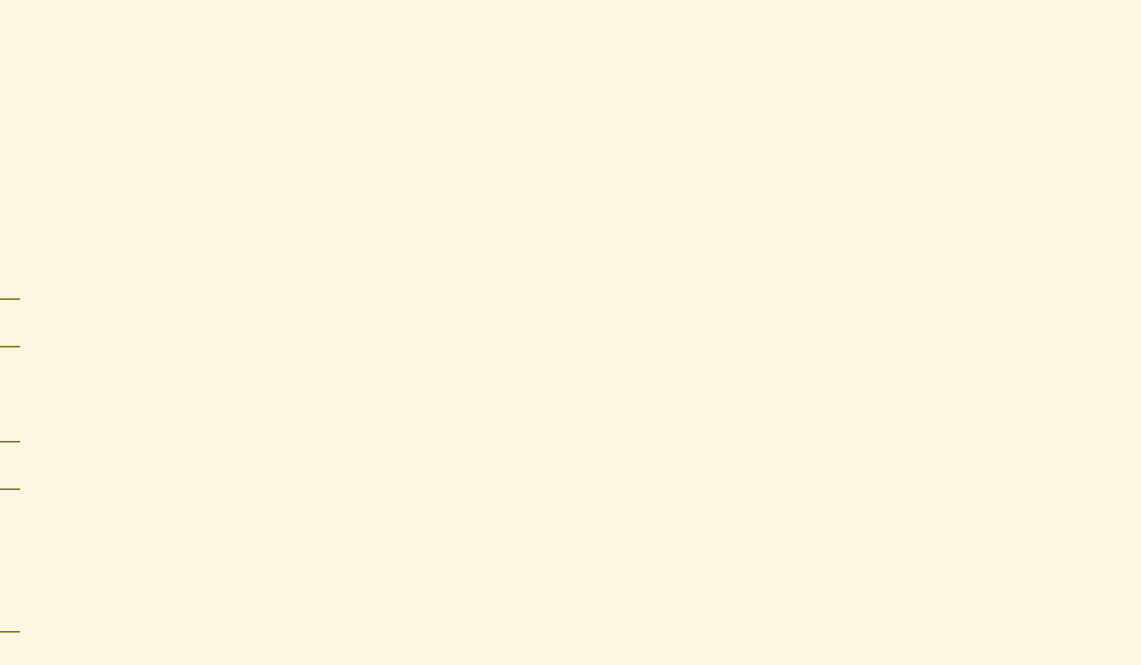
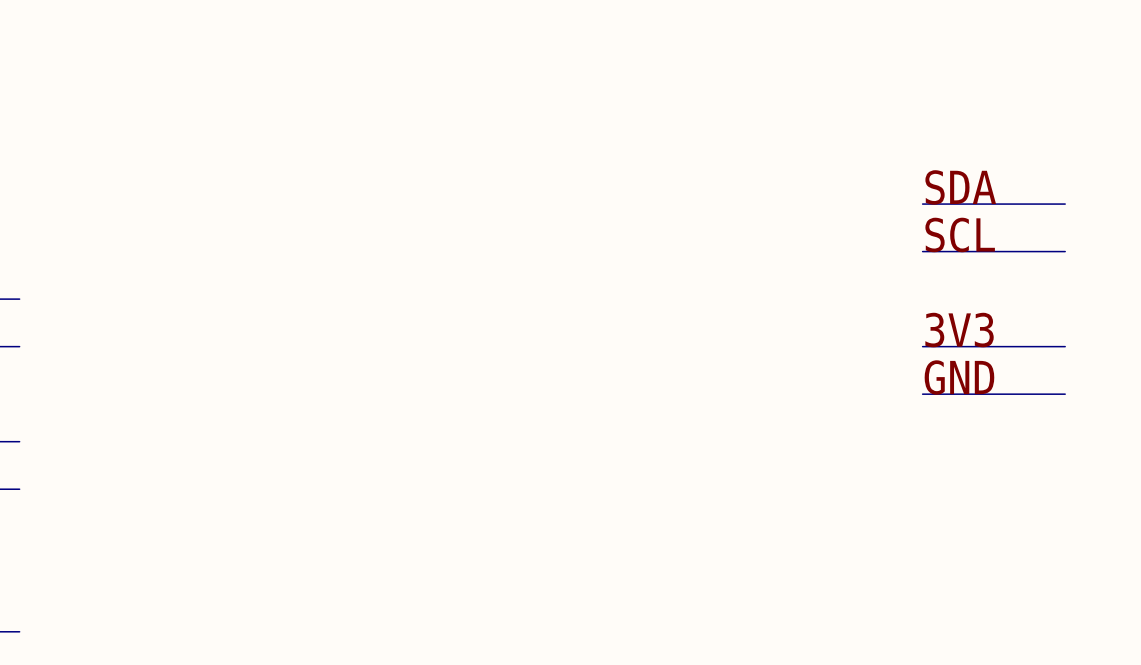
label: none -> SDA (960, 187)
wire: none -> (922, 204) (1065, 204)
label: none -> SCL (960, 234)
wire: none -> (922, 251) (1065, 251)
label: none -> 3V3 (959, 330)
wire: none -> (922, 346) (1065, 346)
label: none -> GND (959, 377)
wire: none -> (922, 394) (1065, 394)

